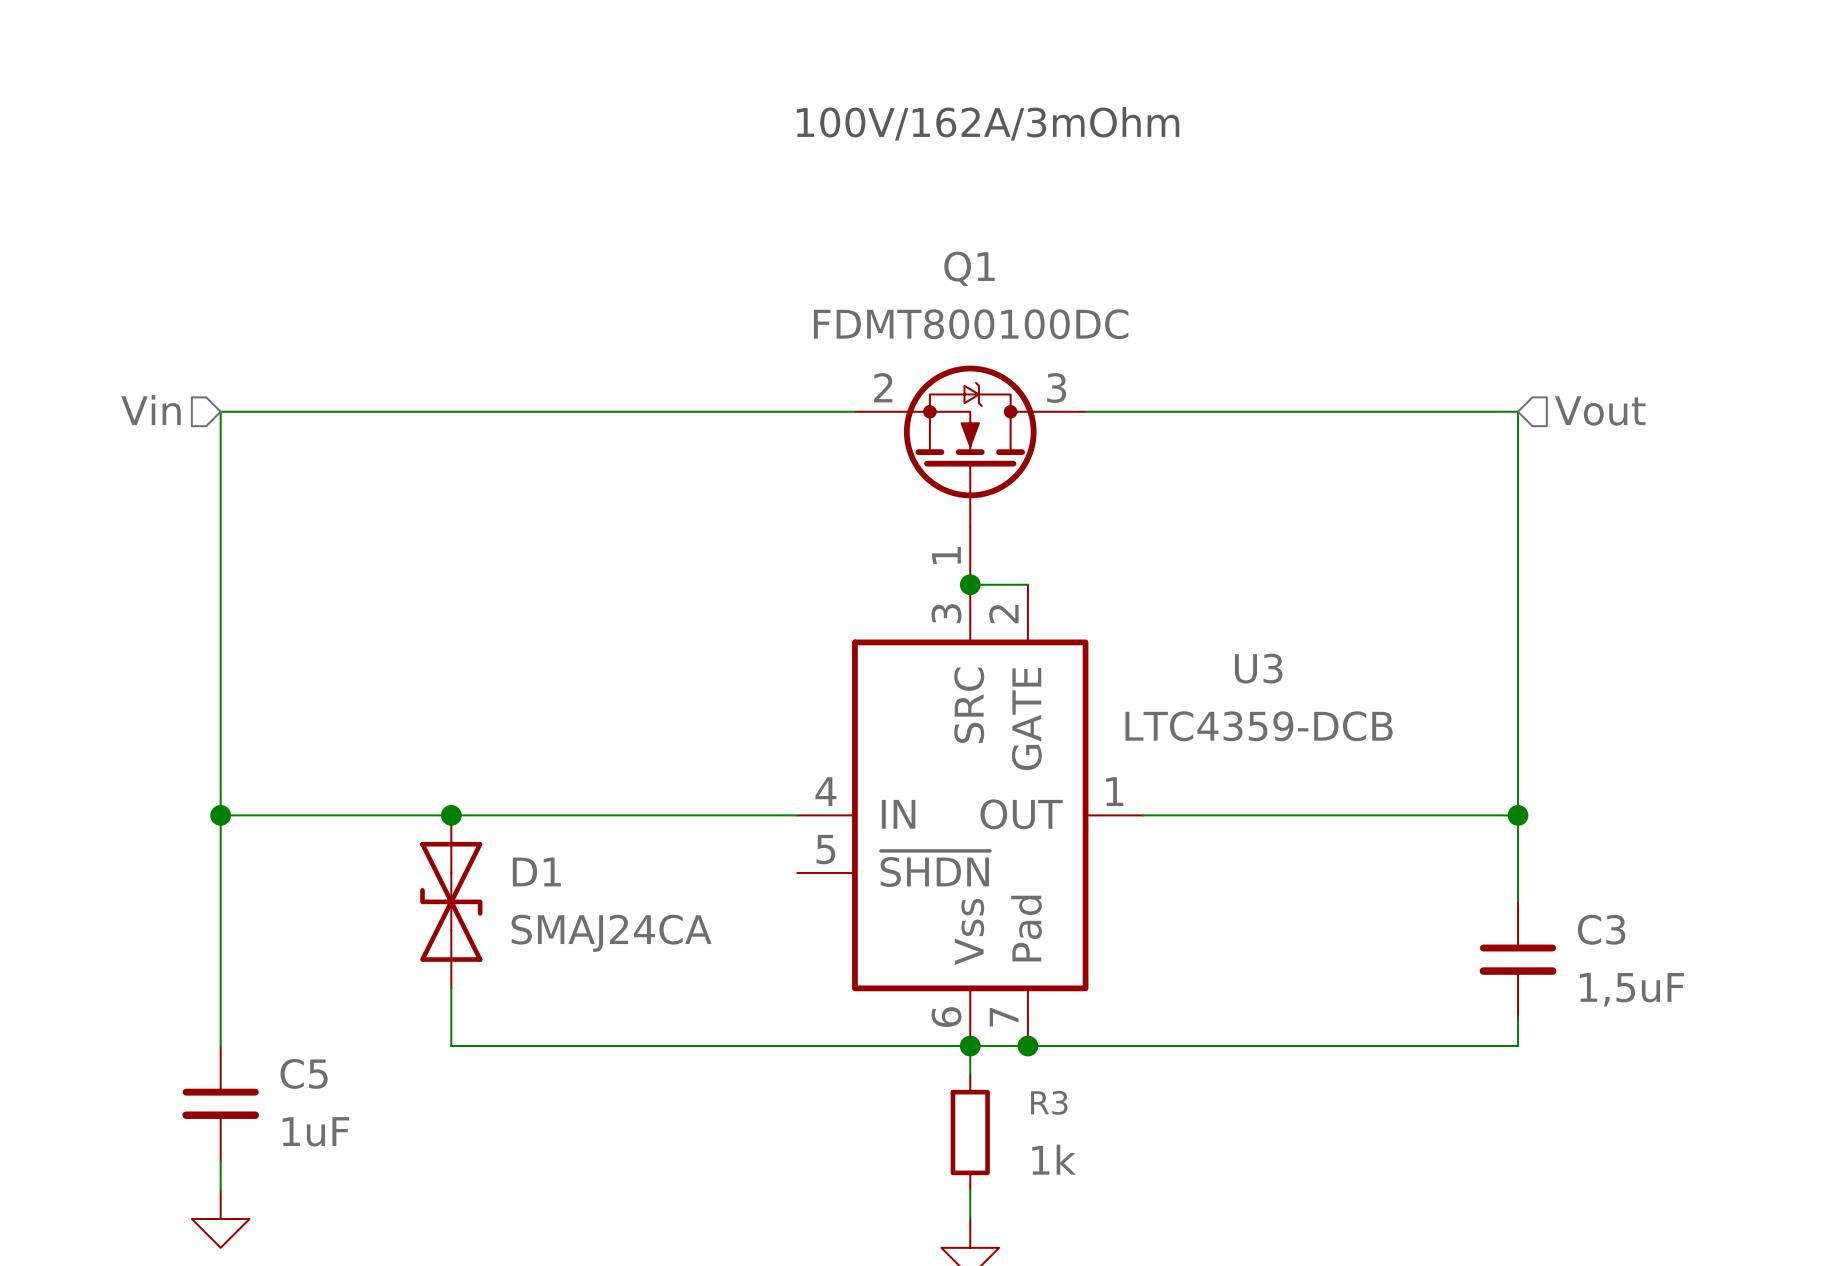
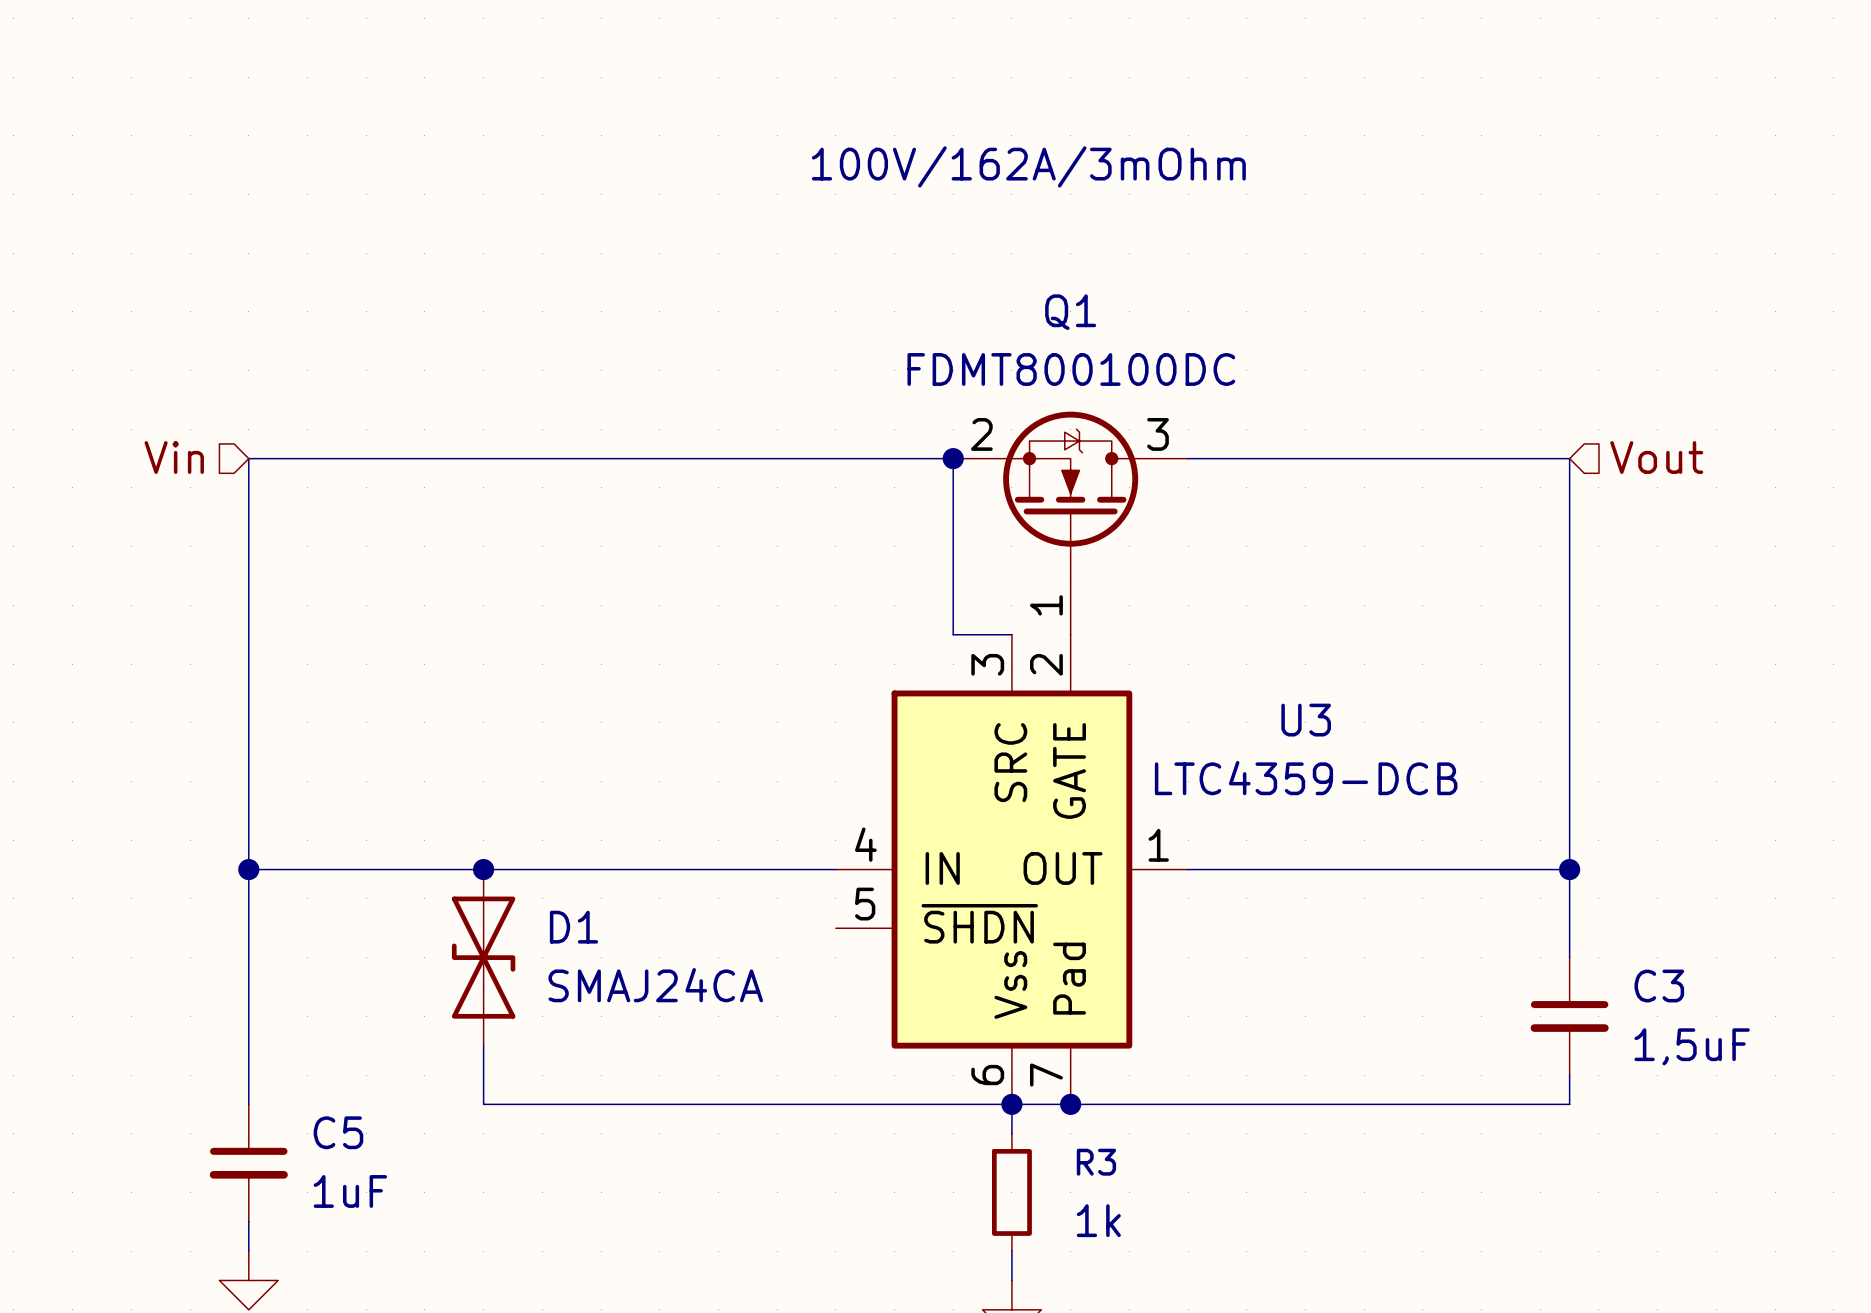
junction: none -> (953, 458)
Q1 position: (970, 475) -> (1070, 523)
wire: (970, 584) (1027, 584) -> (1011, 634) (953, 634) (953, 458) (894, 458)
junction: (970, 584) -> none

